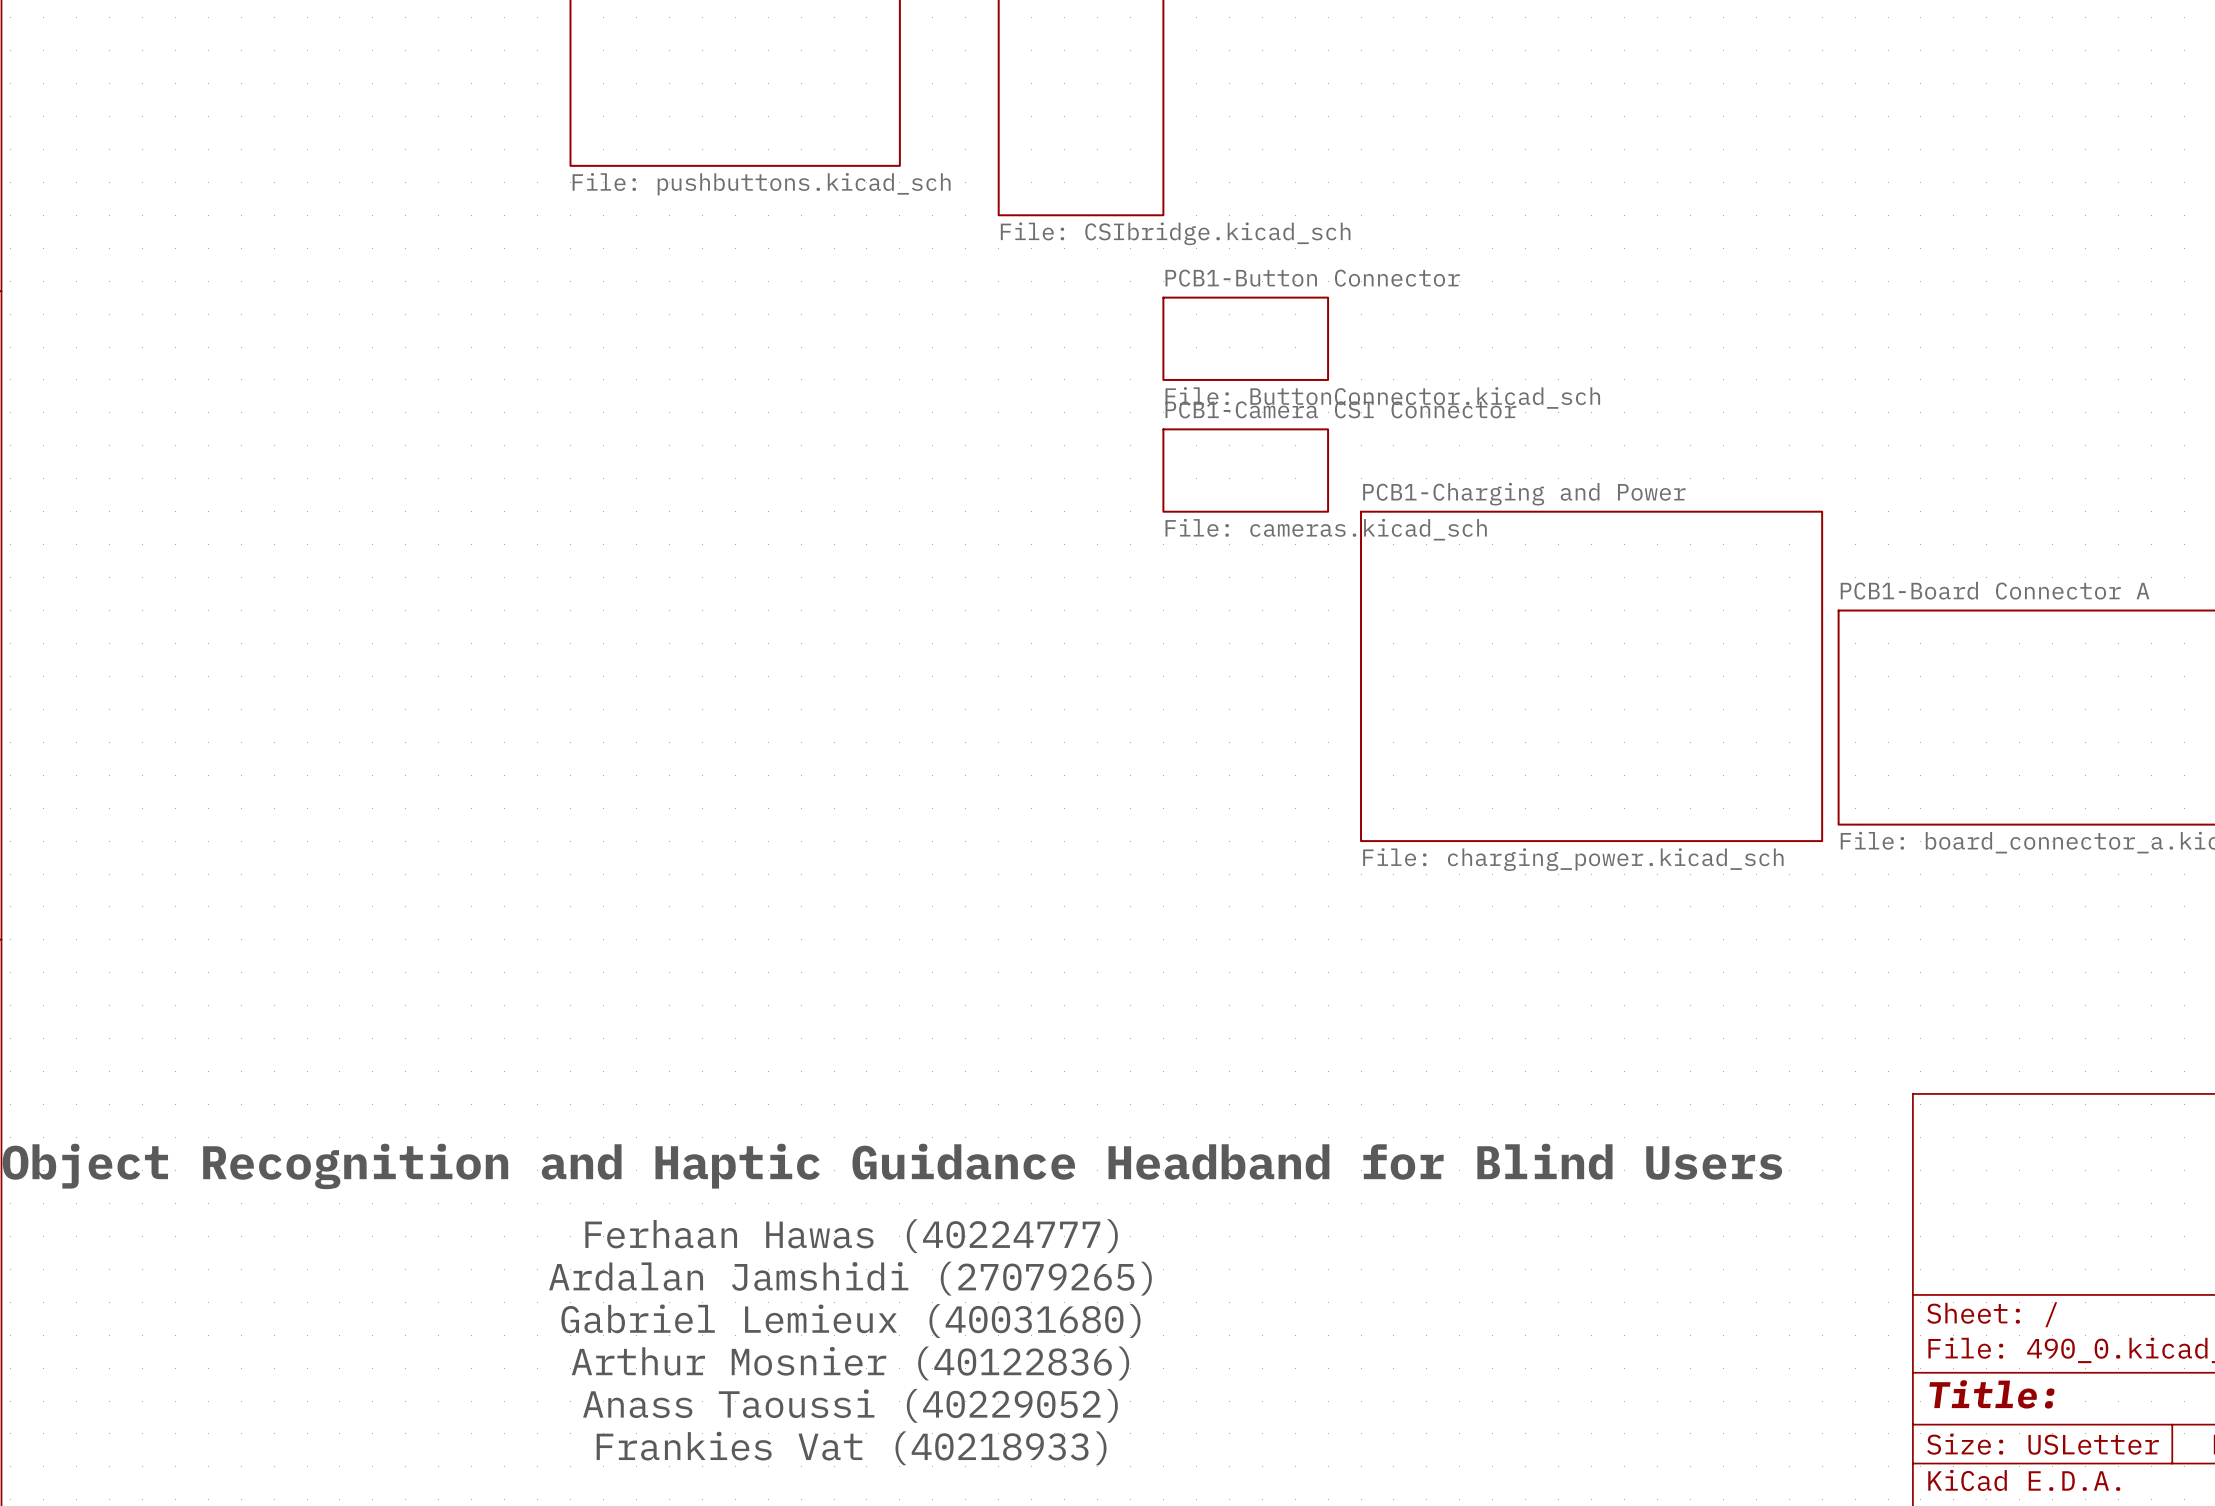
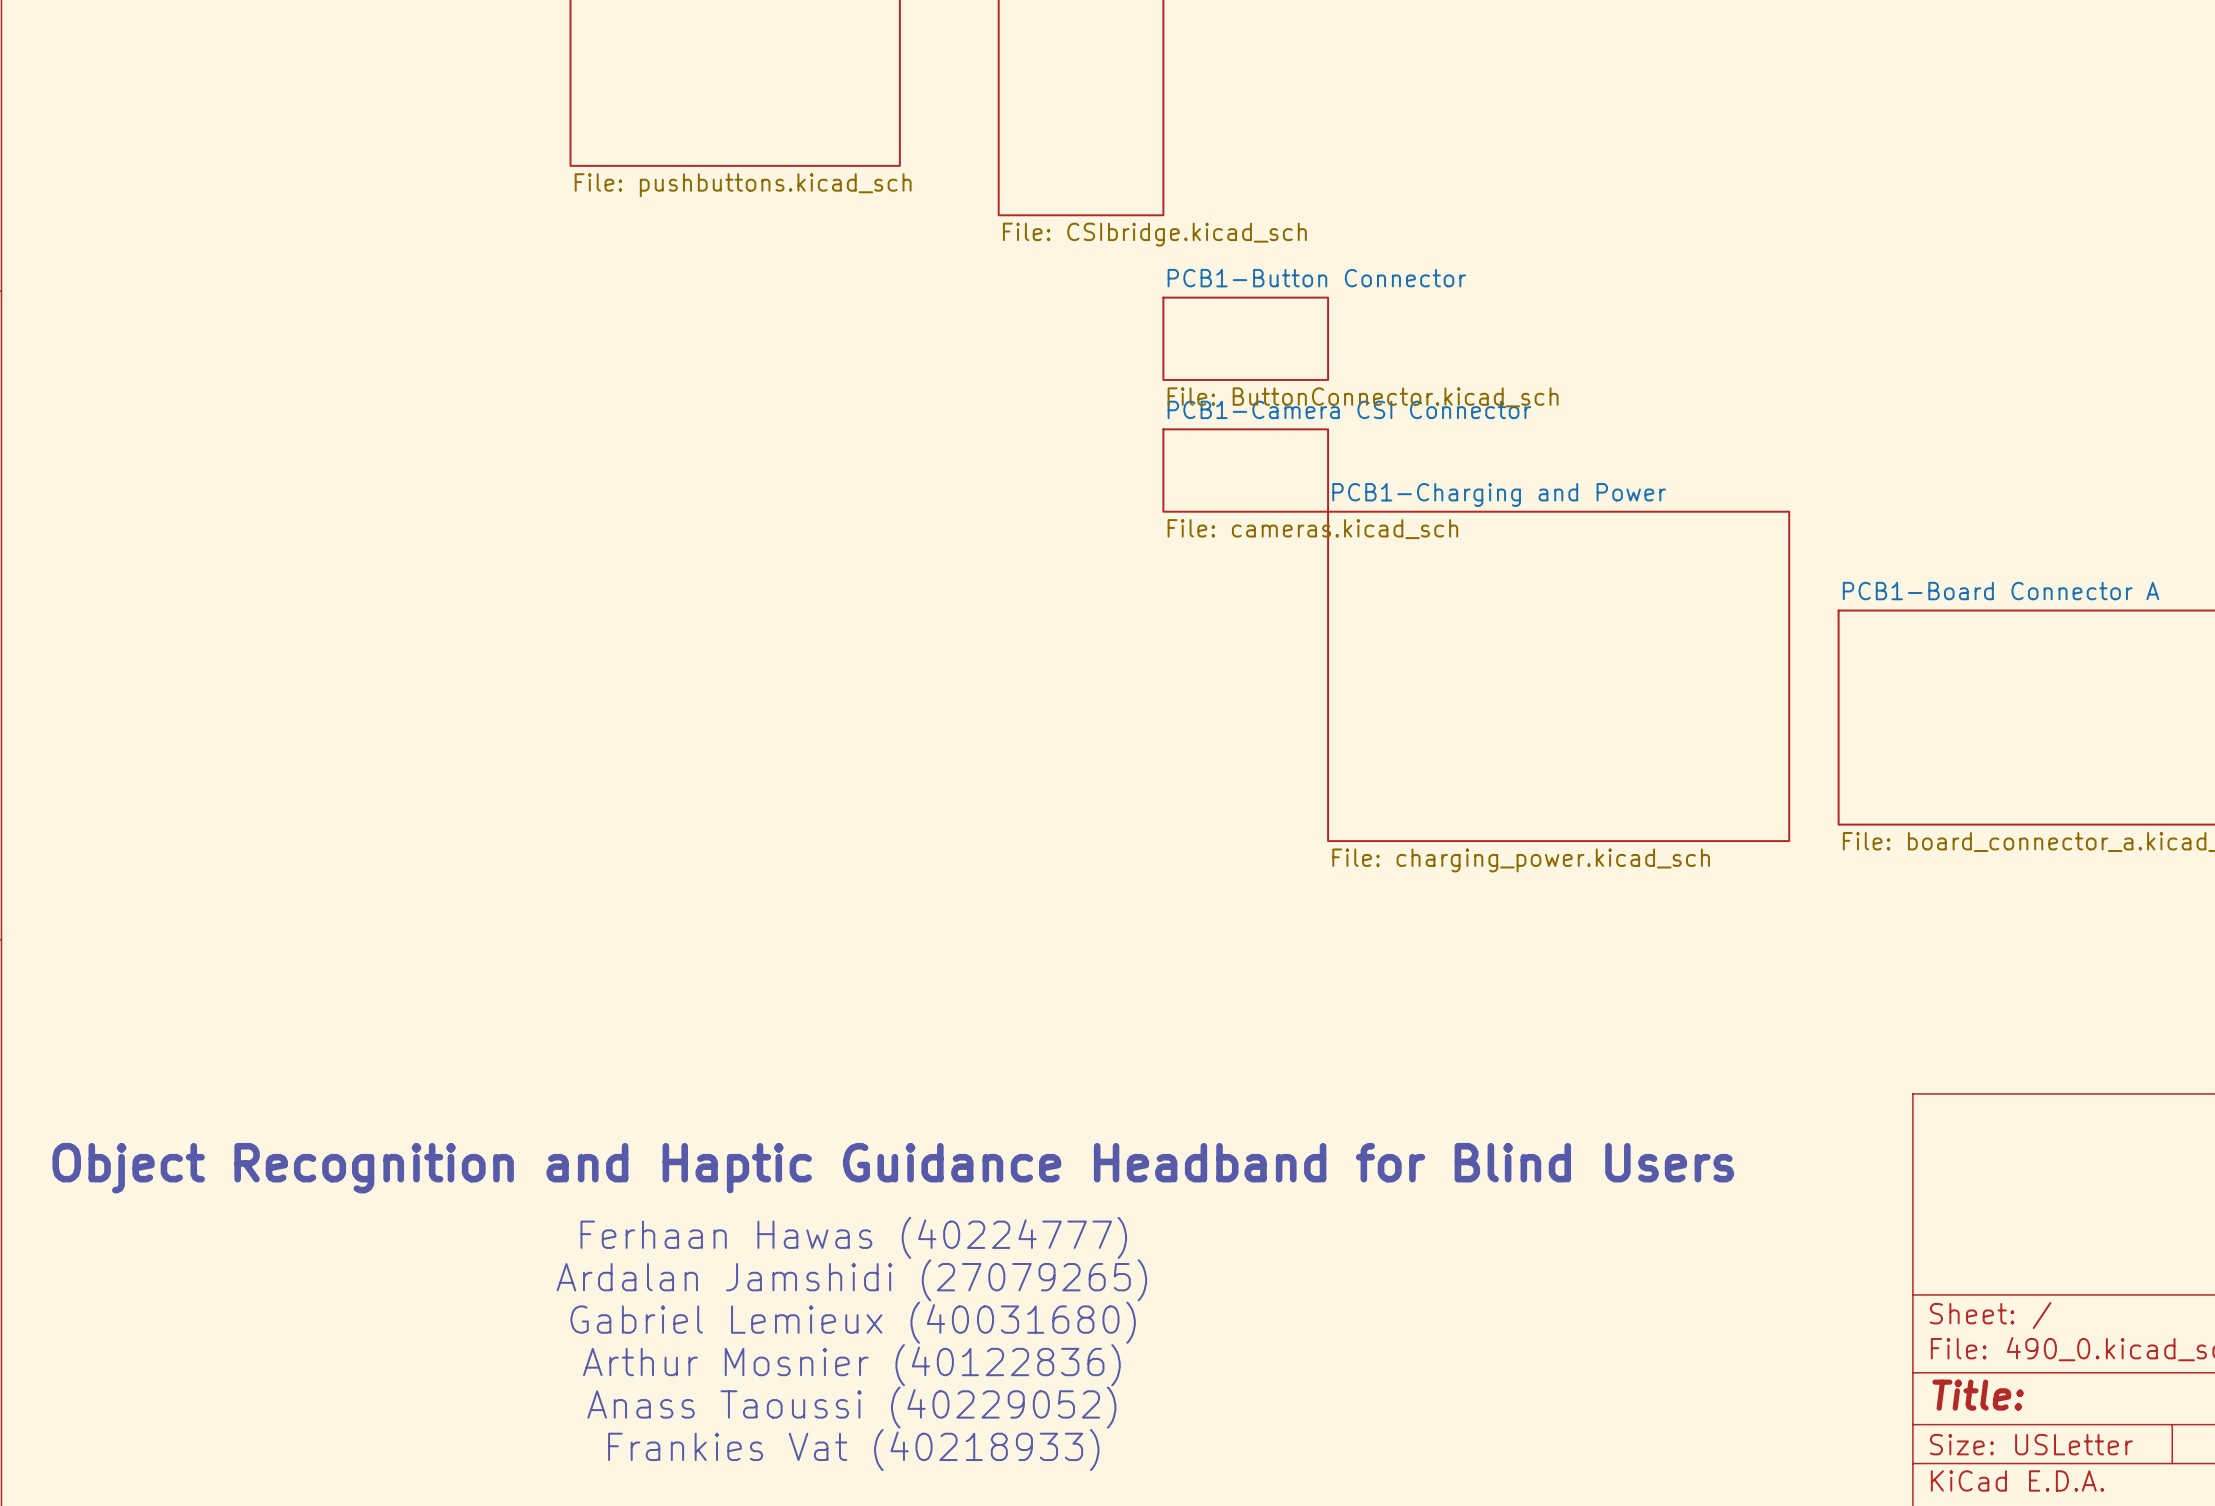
sheet PCB1-Charging and Power position: (1591, 676) -> (1558, 676)

